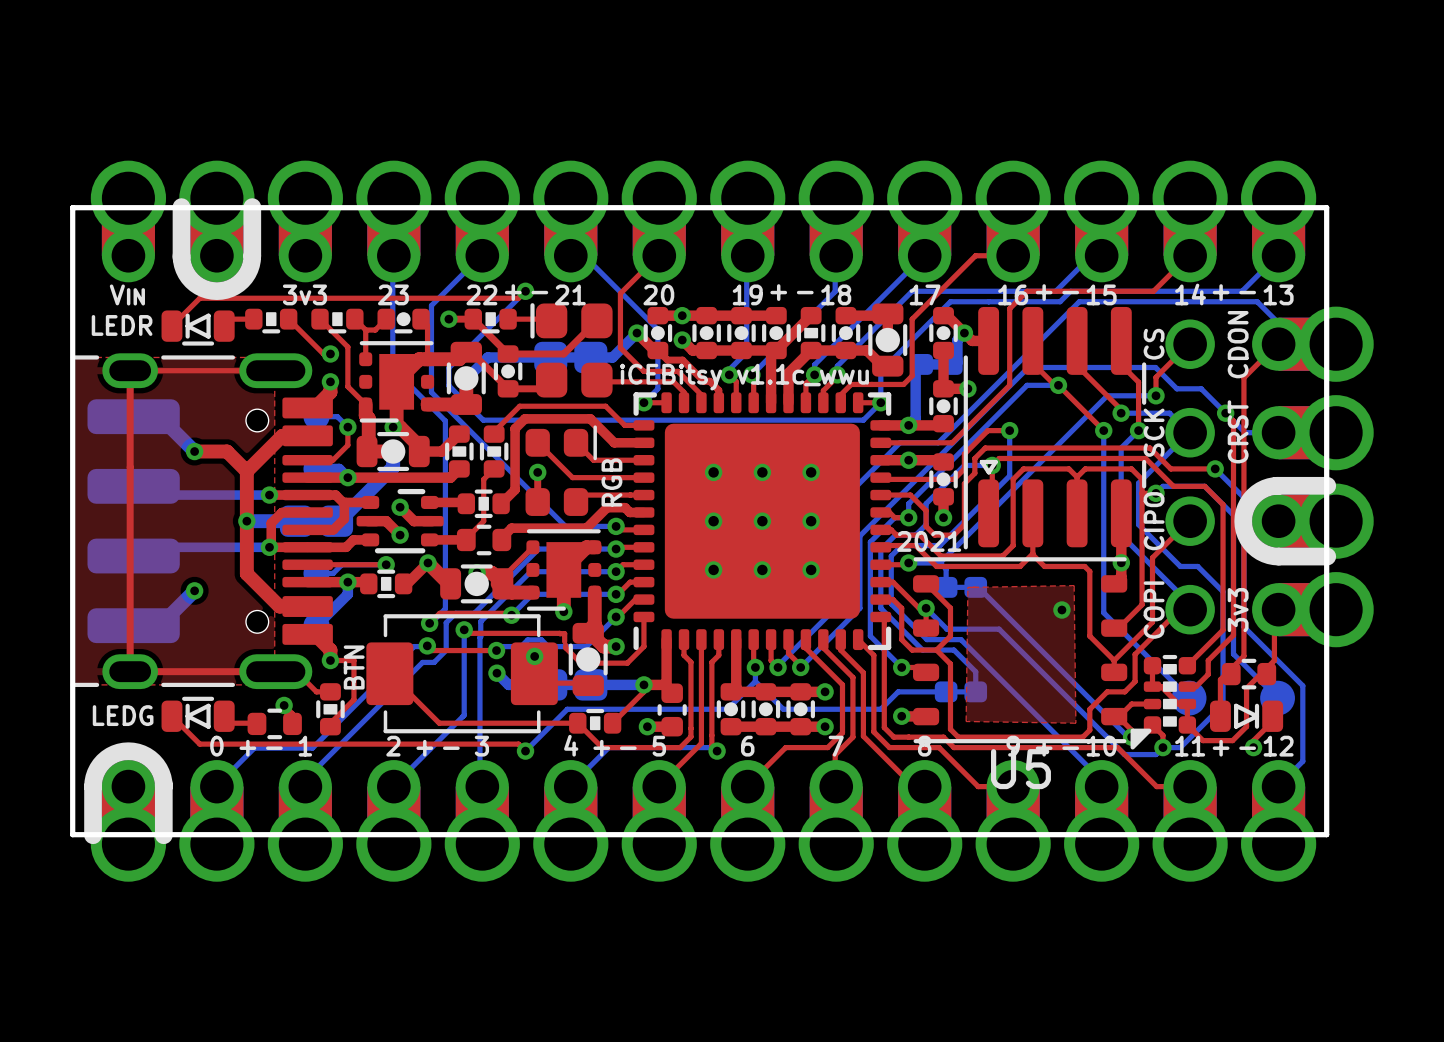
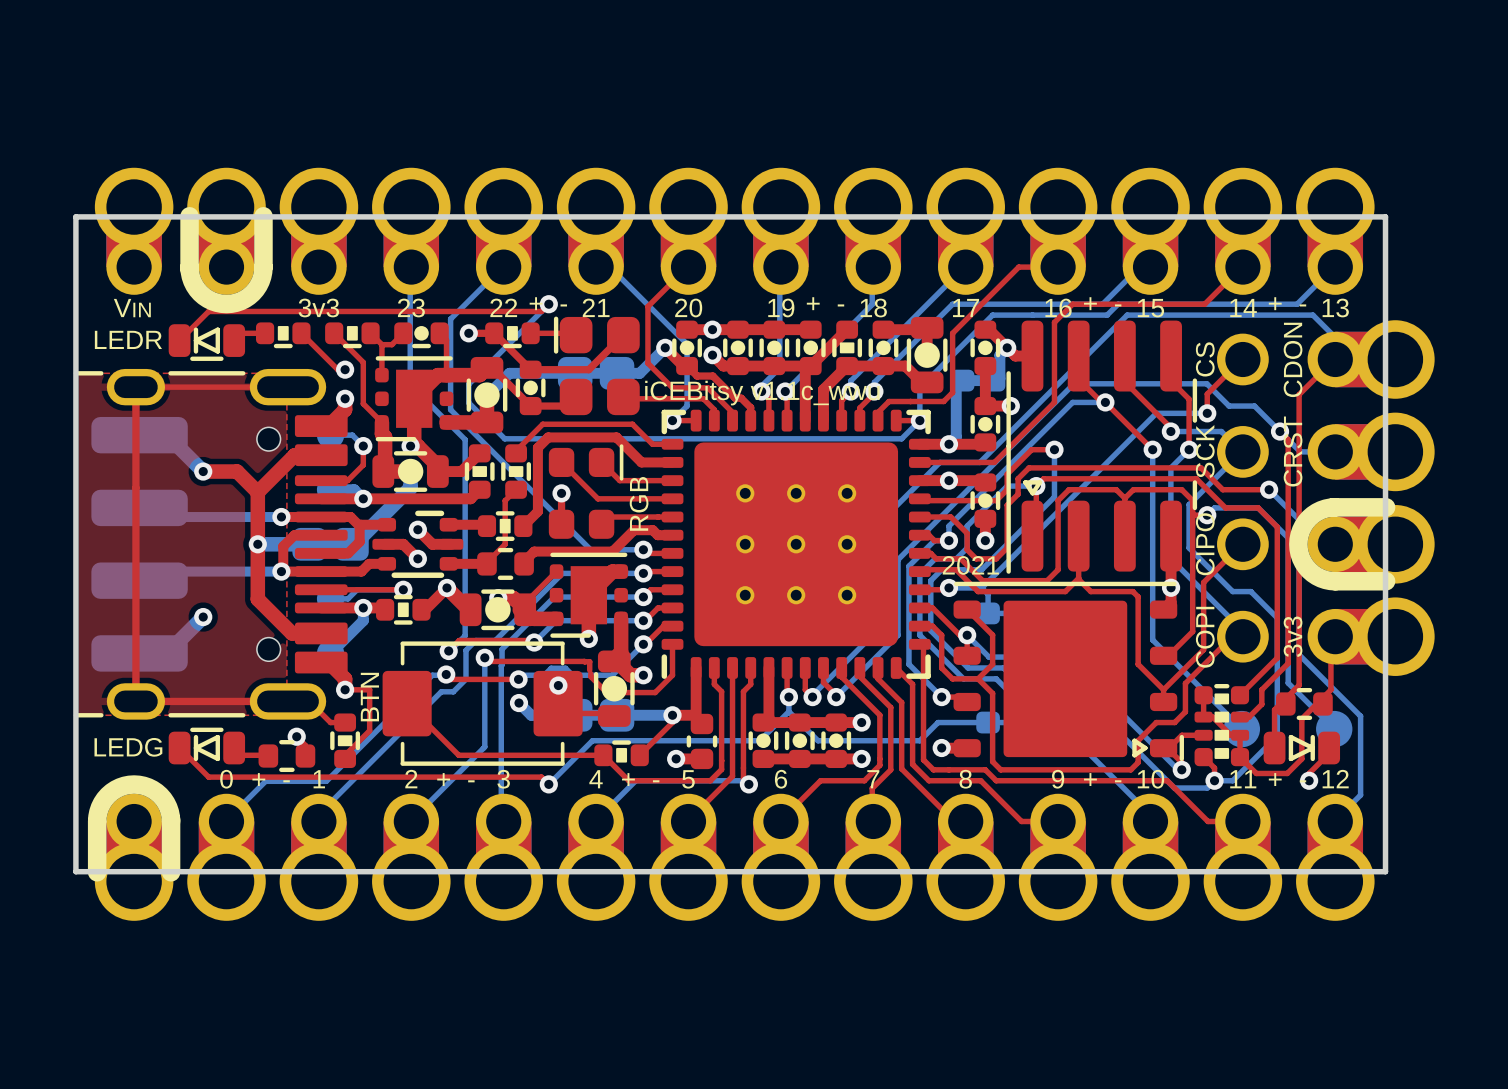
top zone outline: (973, 587) (1074, 585) (1075, 723) (966, 721) (967, 587) (976, 587) -> none
via: (1061, 610) -> none
part: none -> (1068, 671)
U5: (1032, 653) -> none

